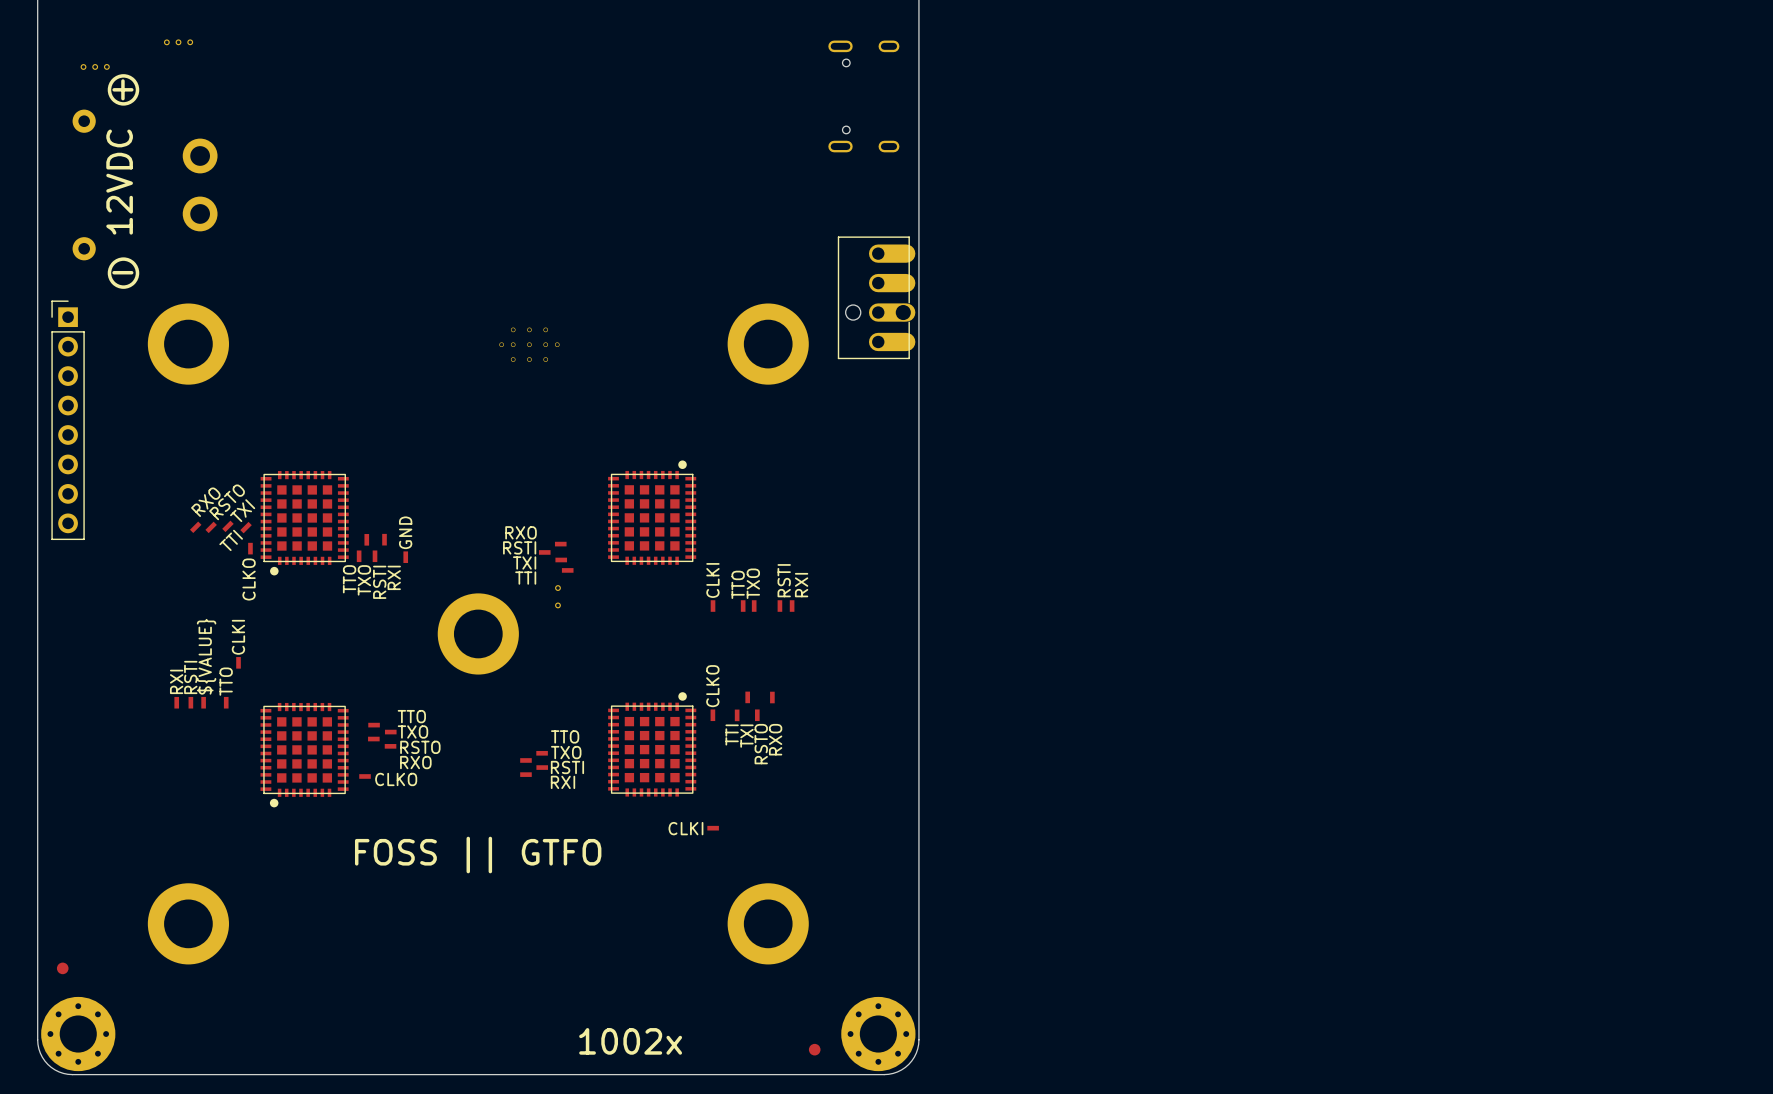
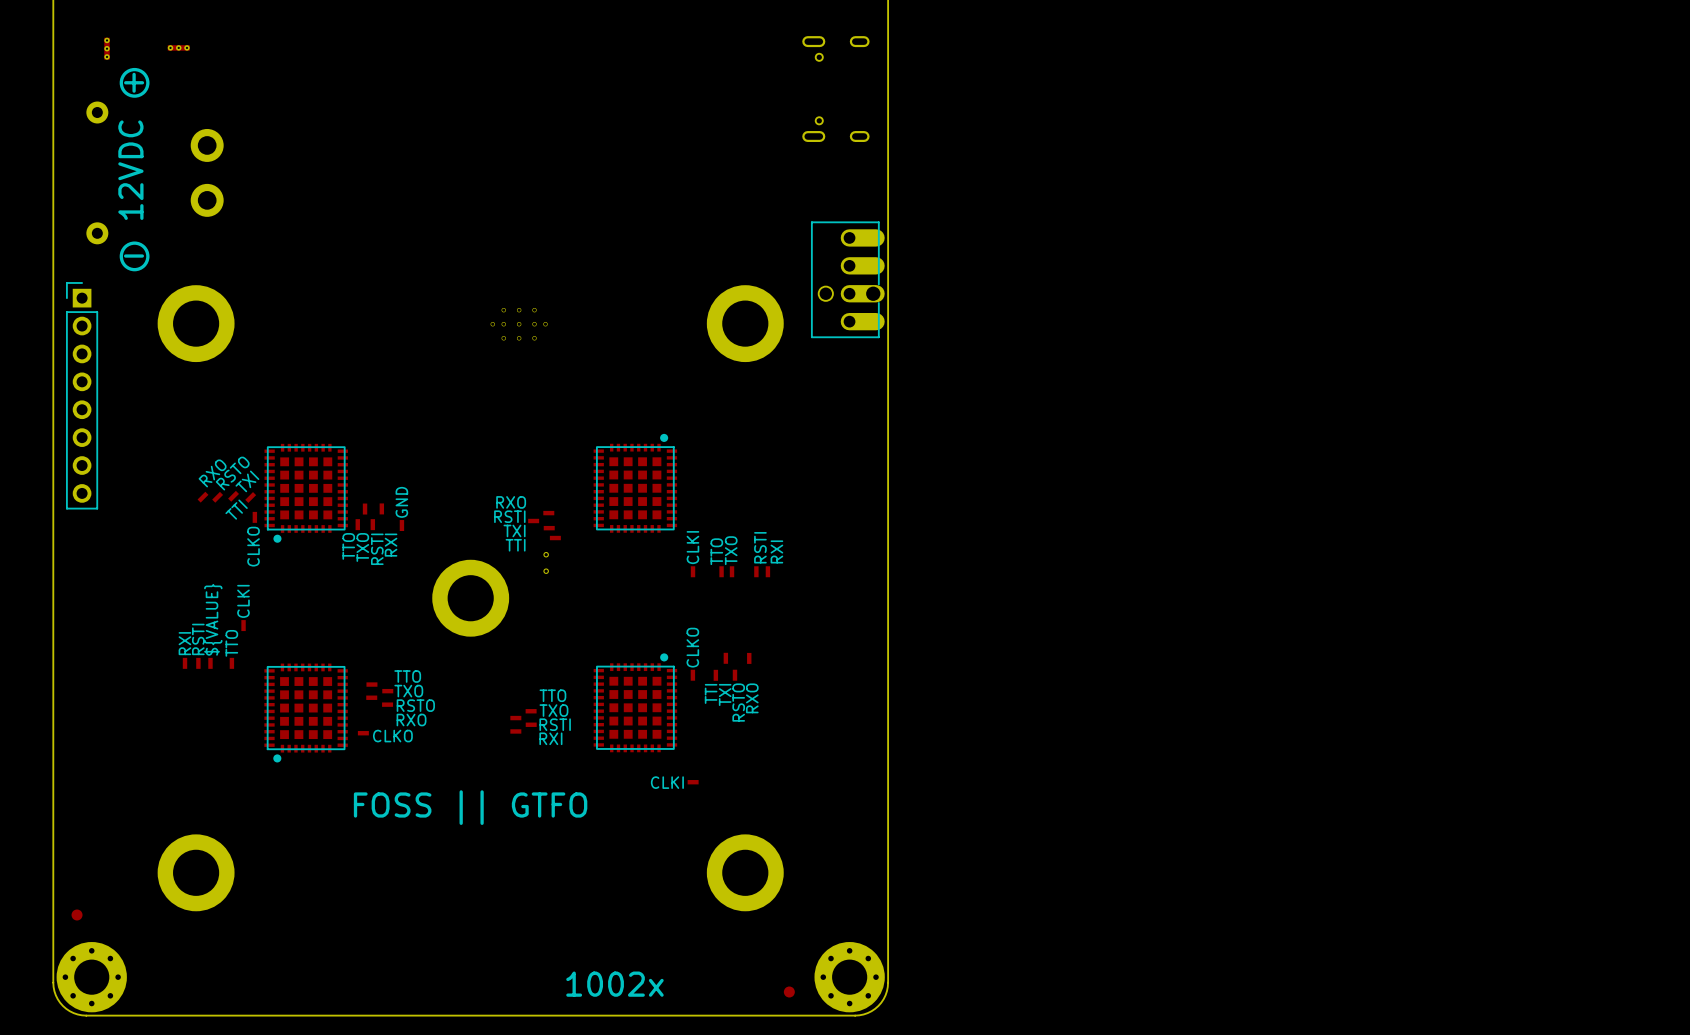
part: (178, 42) -> none
part: none -> (107, 48)
part: none -> (178, 47)
part: (95, 66) -> none

